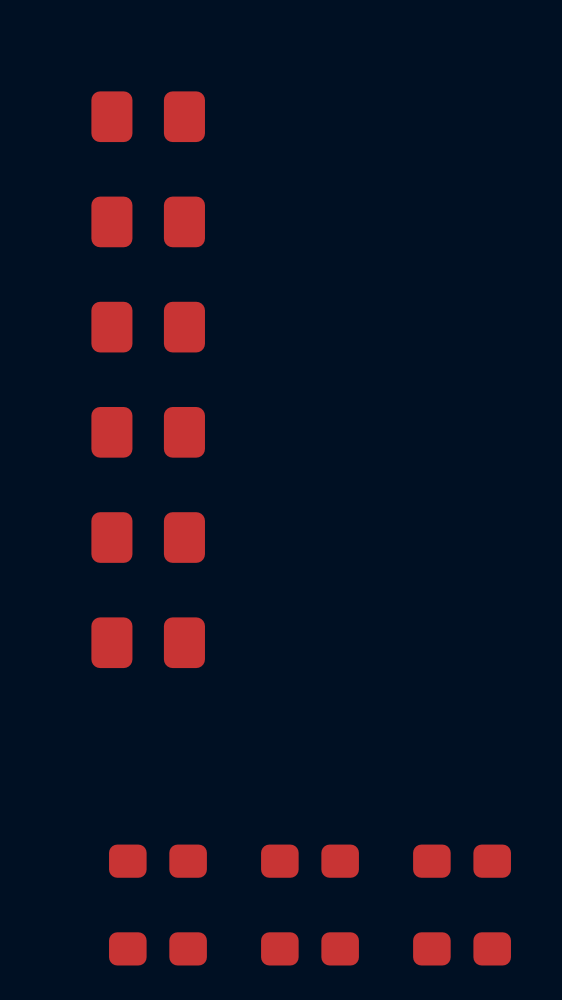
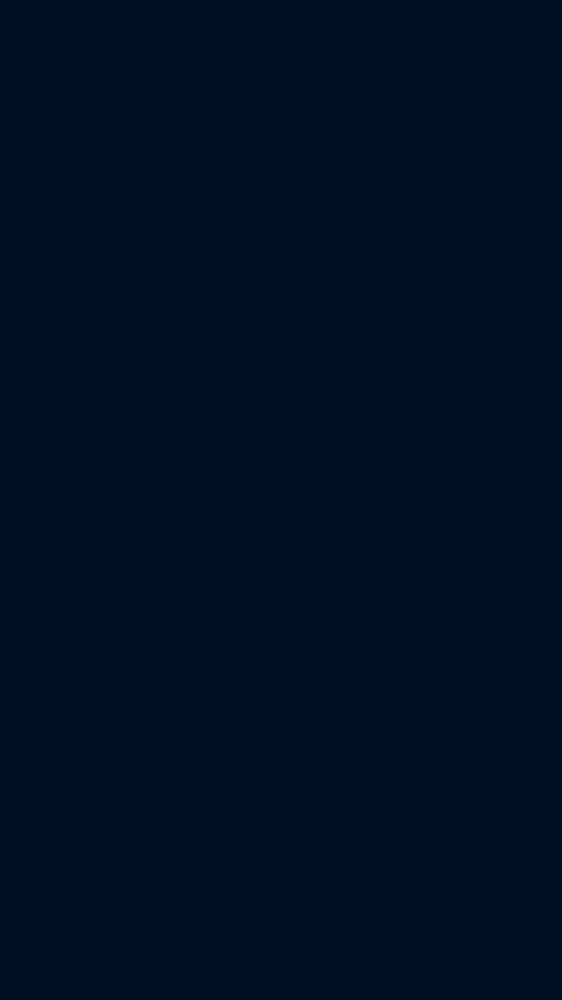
part: (148, 116) -> none
part: (148, 221) -> none
part: (148, 327) -> none
part: (148, 432) -> none
part: (148, 537) -> none
part: (148, 642) -> none
part: (157, 861) -> none
part: (310, 861) -> none
part: (462, 861) -> none
part: (157, 948) -> none
part: (310, 948) -> none
part: (462, 948) -> none

